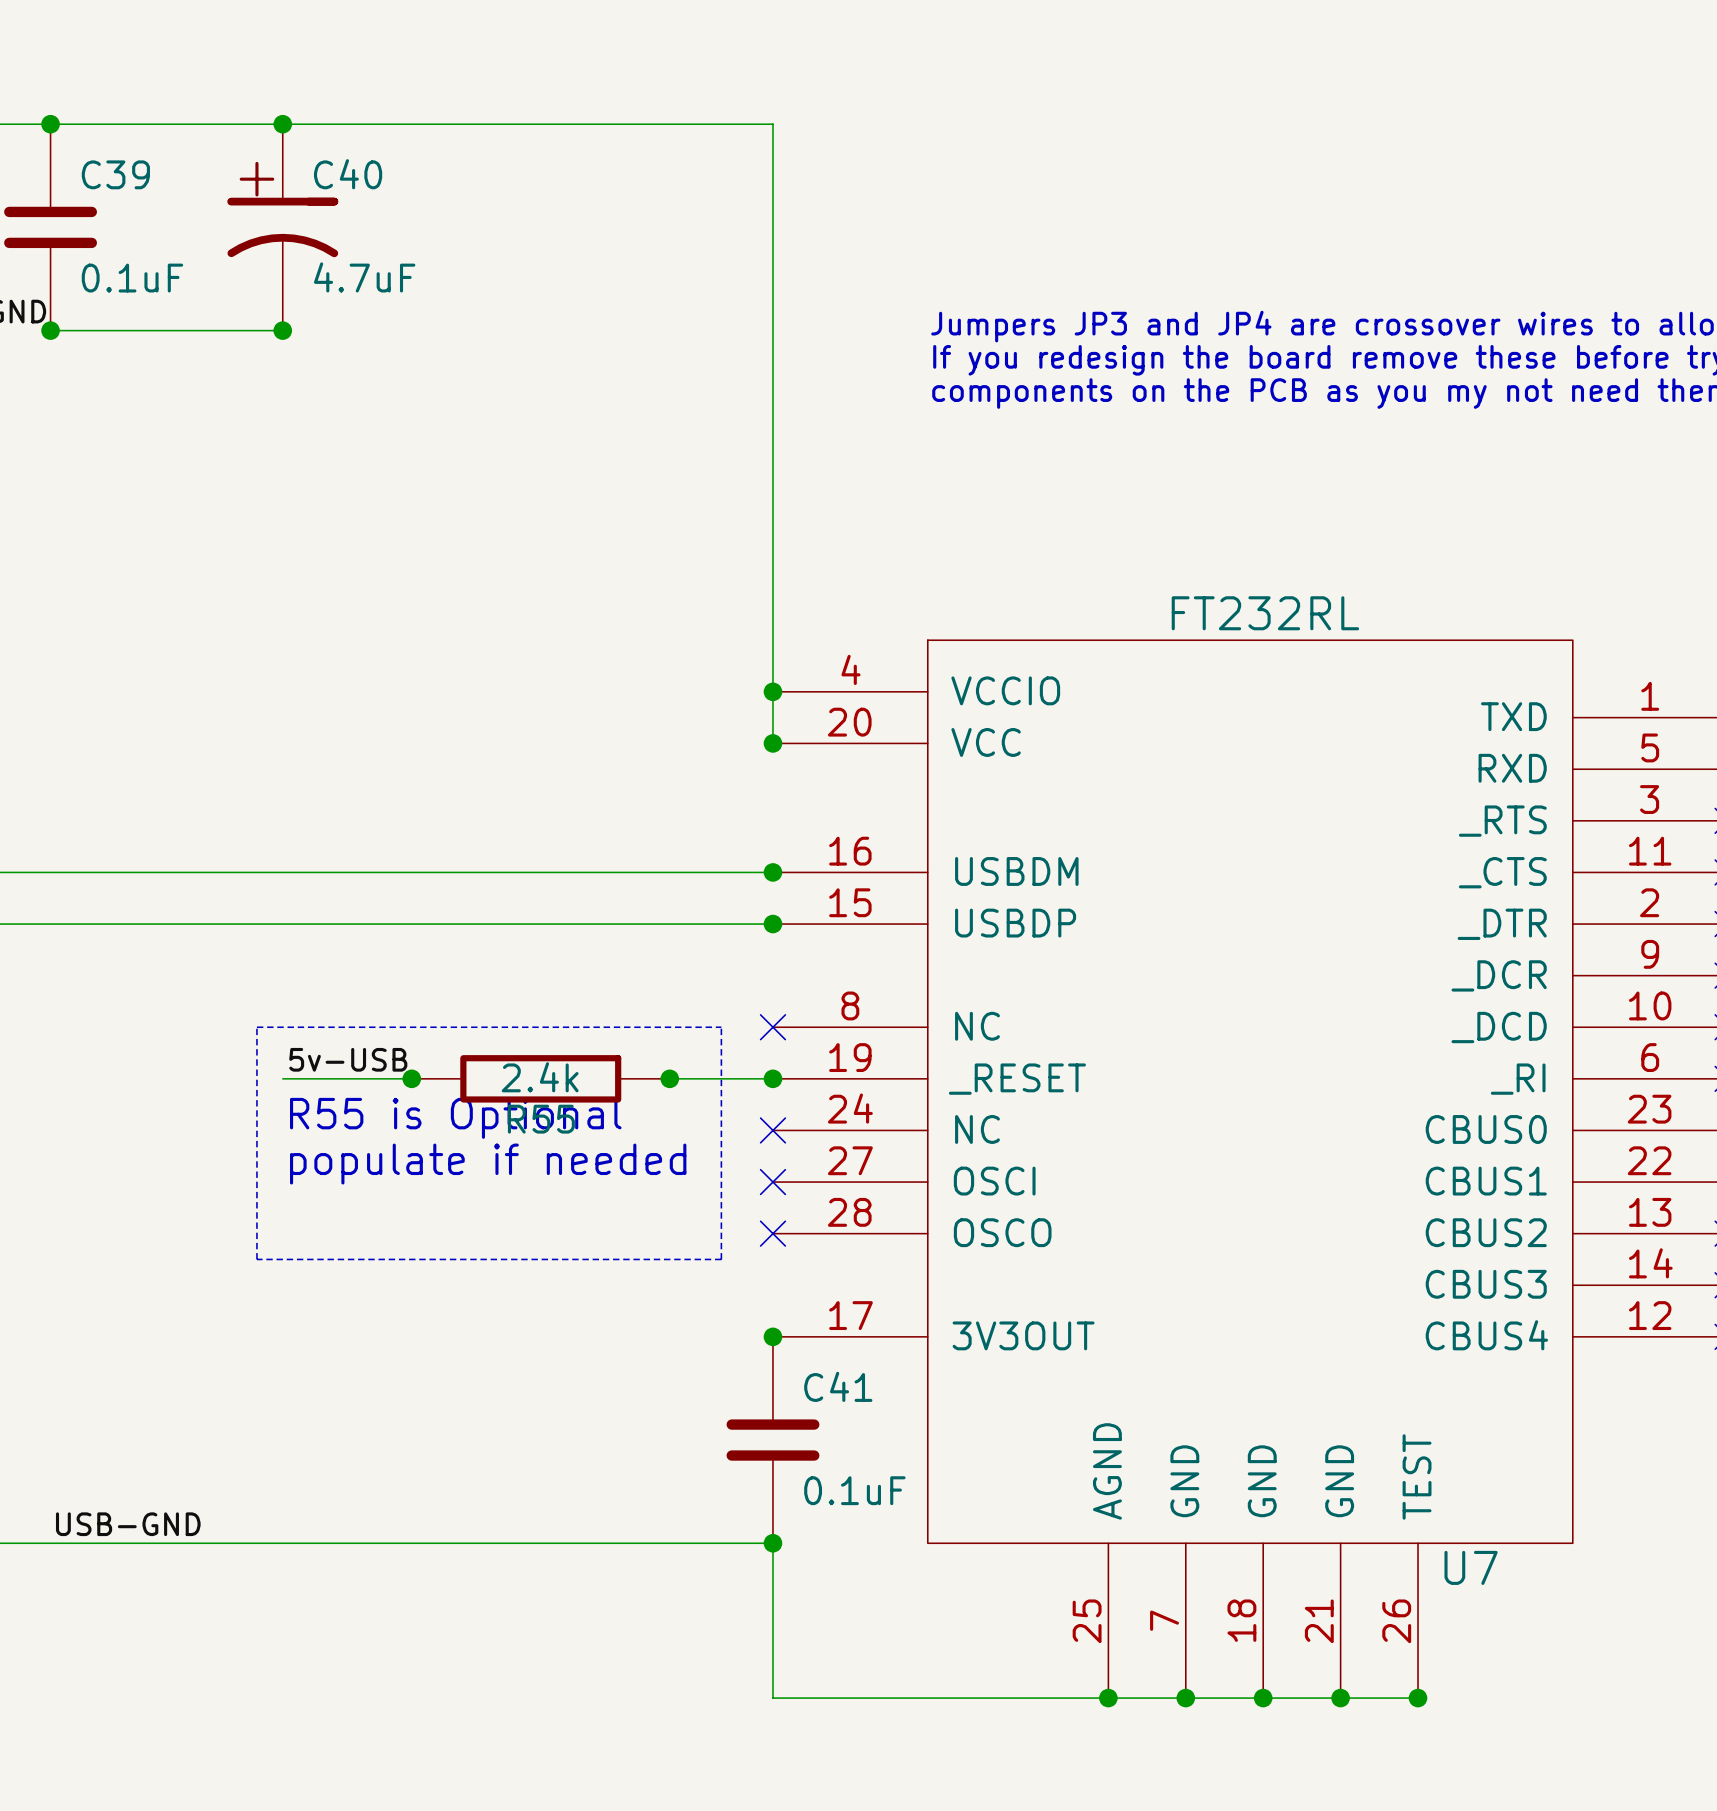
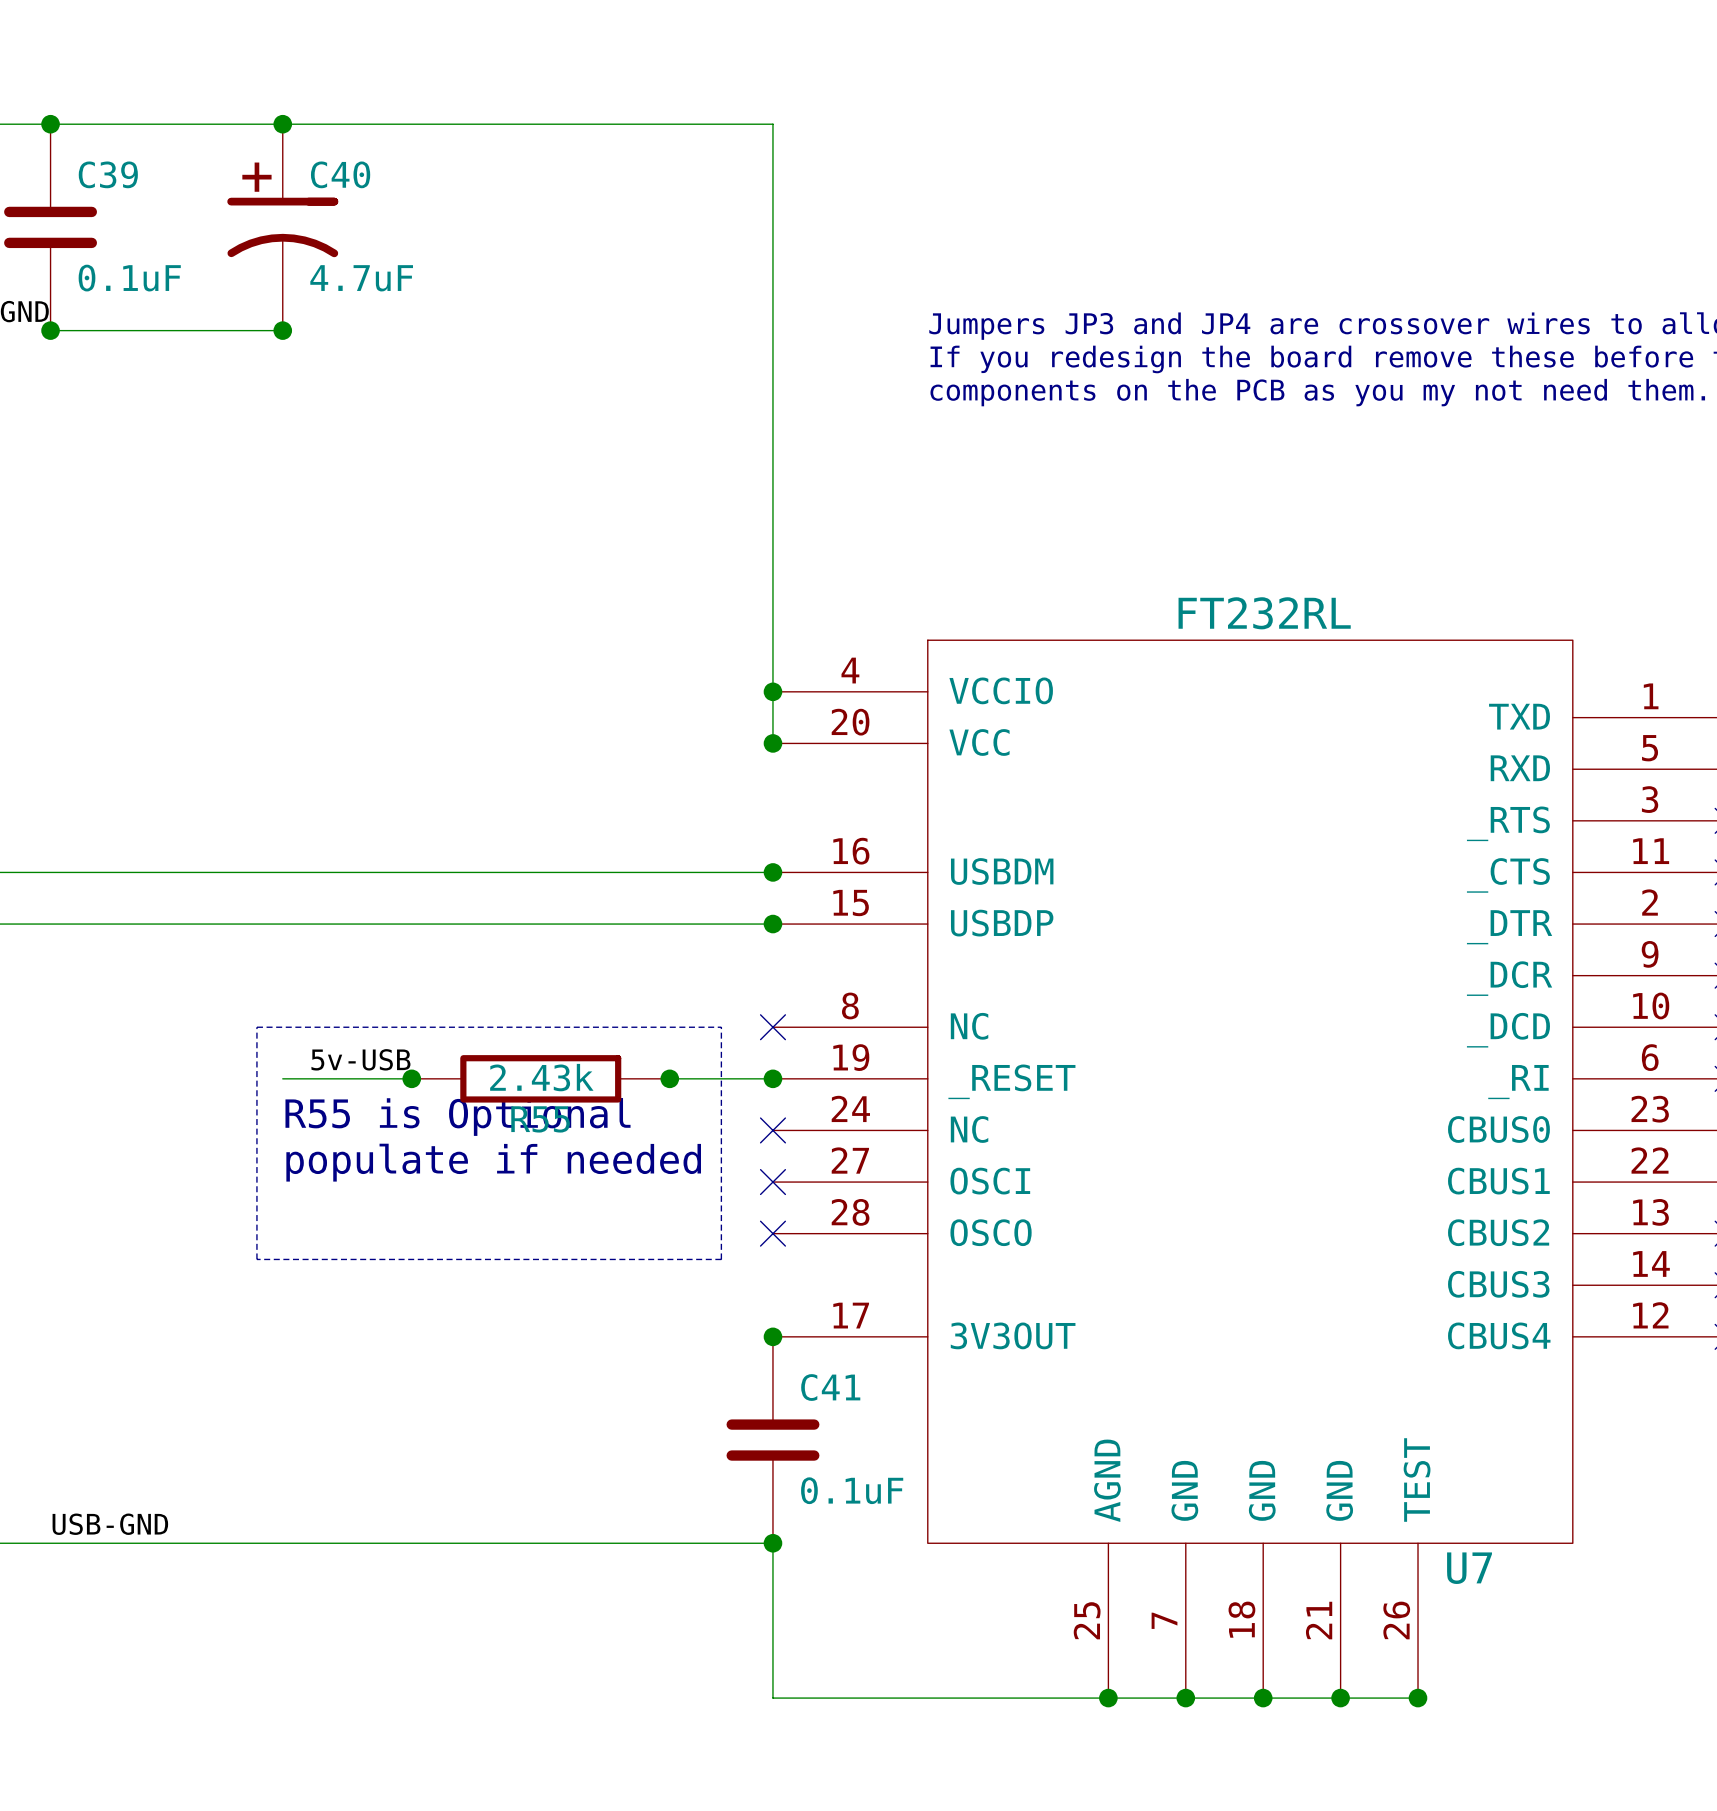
R55 value: 2.4k (540, 1077) -> 2.43k (541, 1077)

